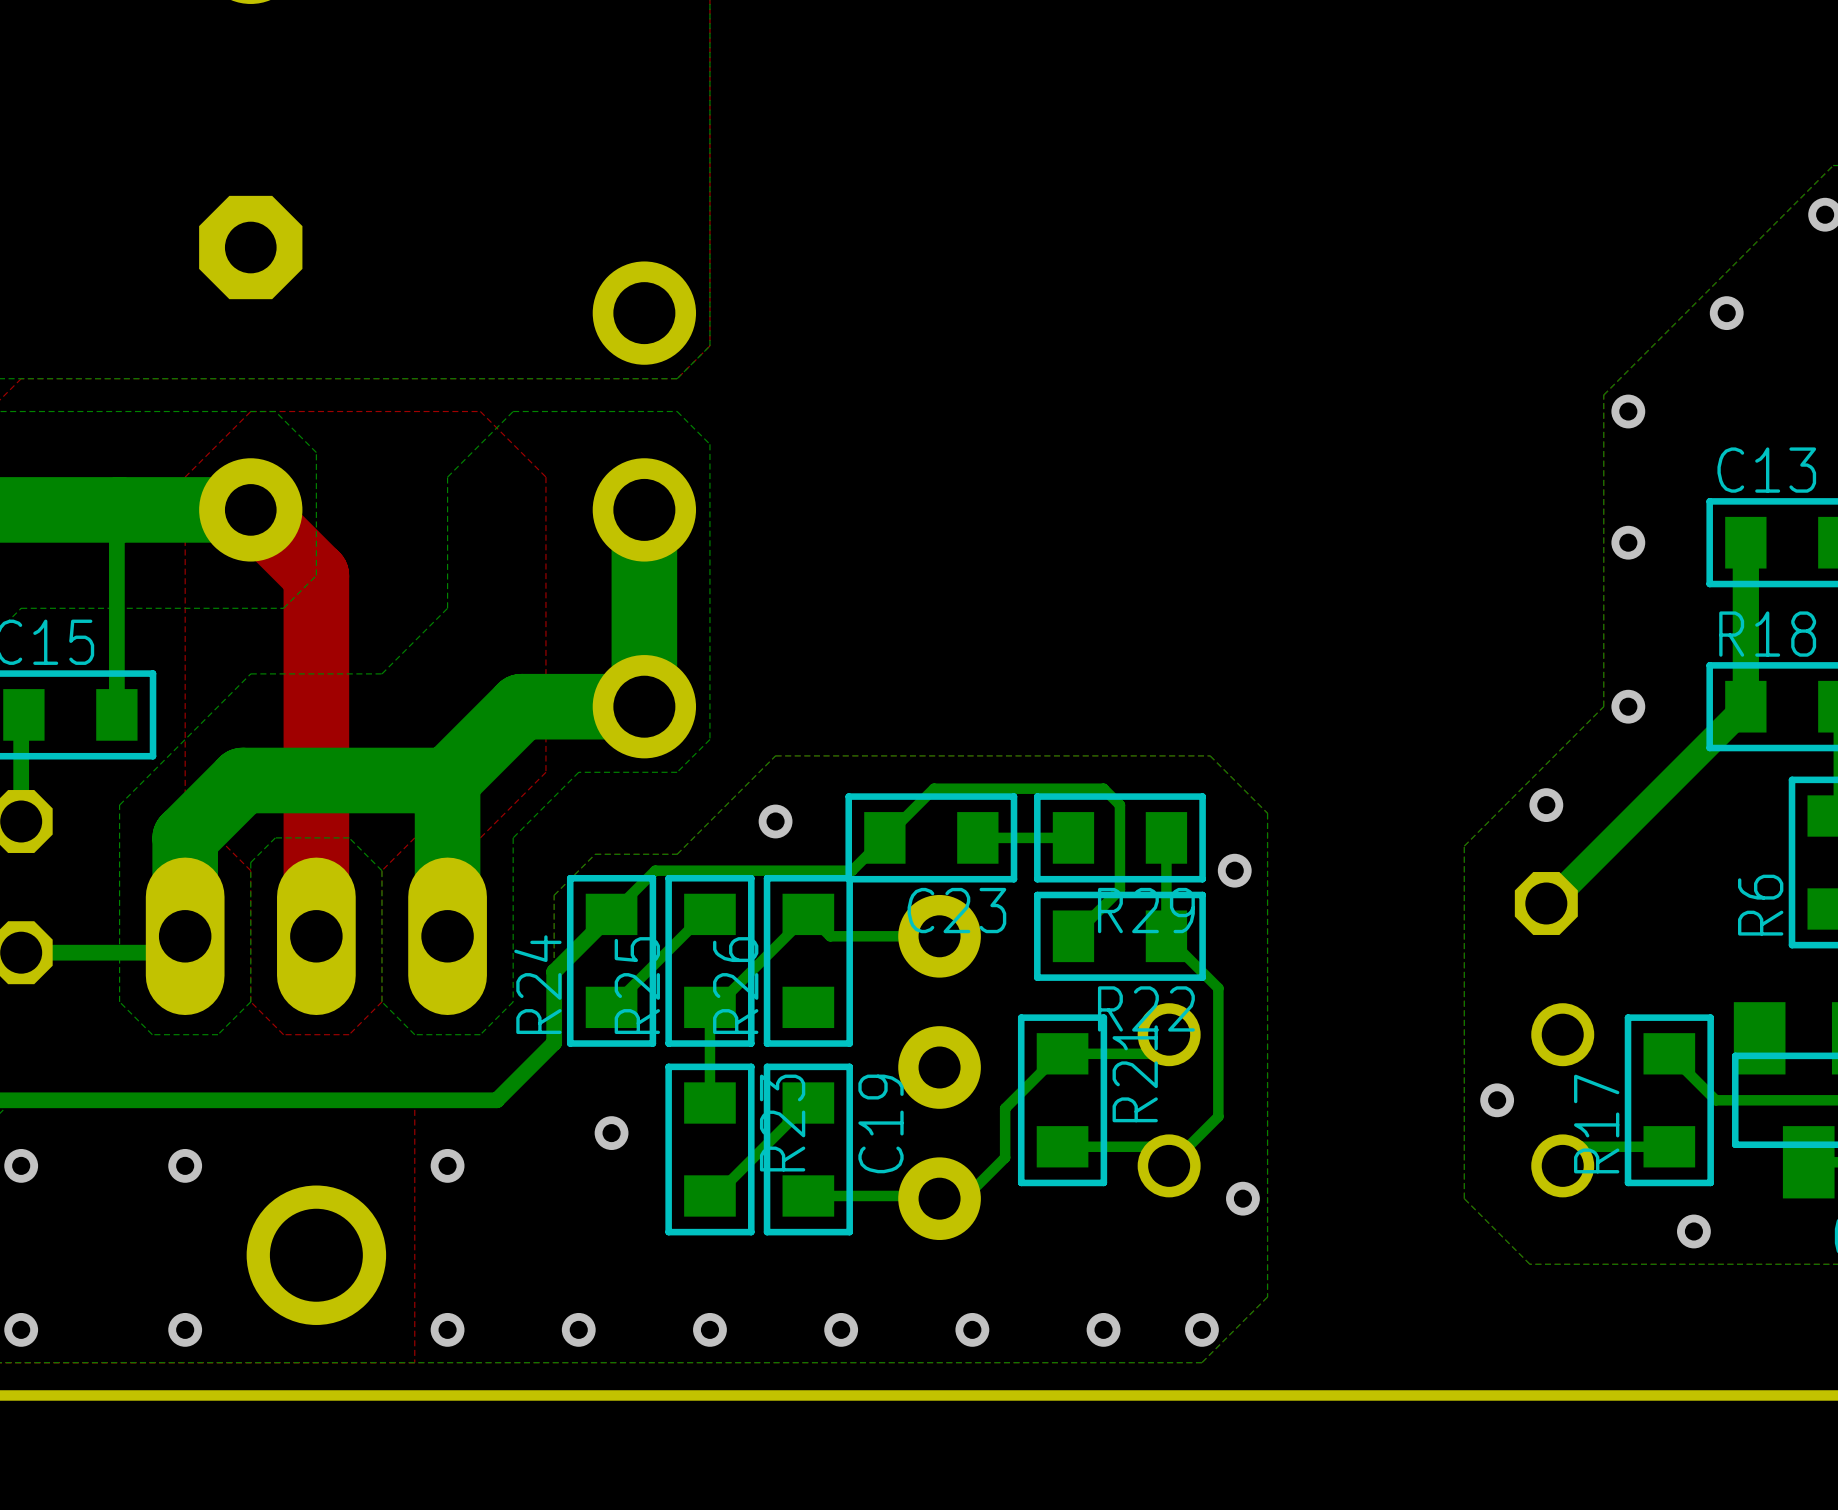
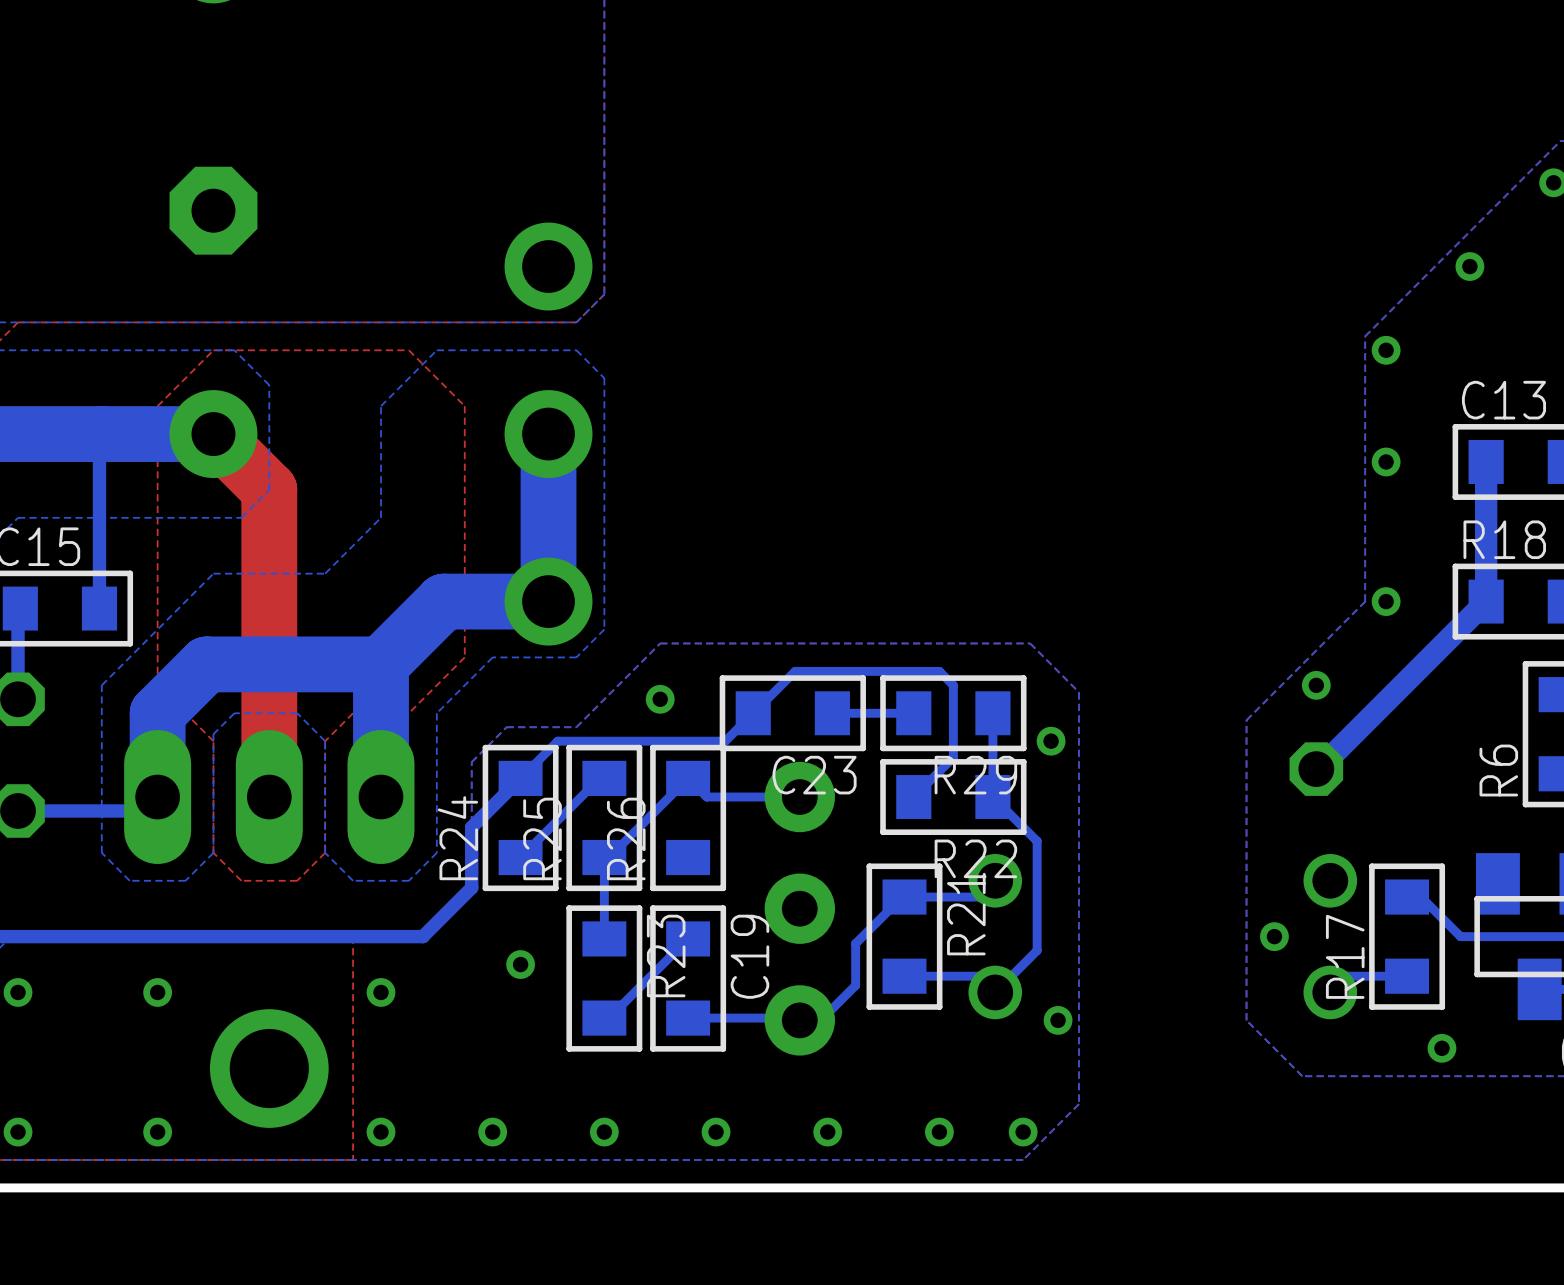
R17 position: (1669, 1100) -> (1407, 936)

